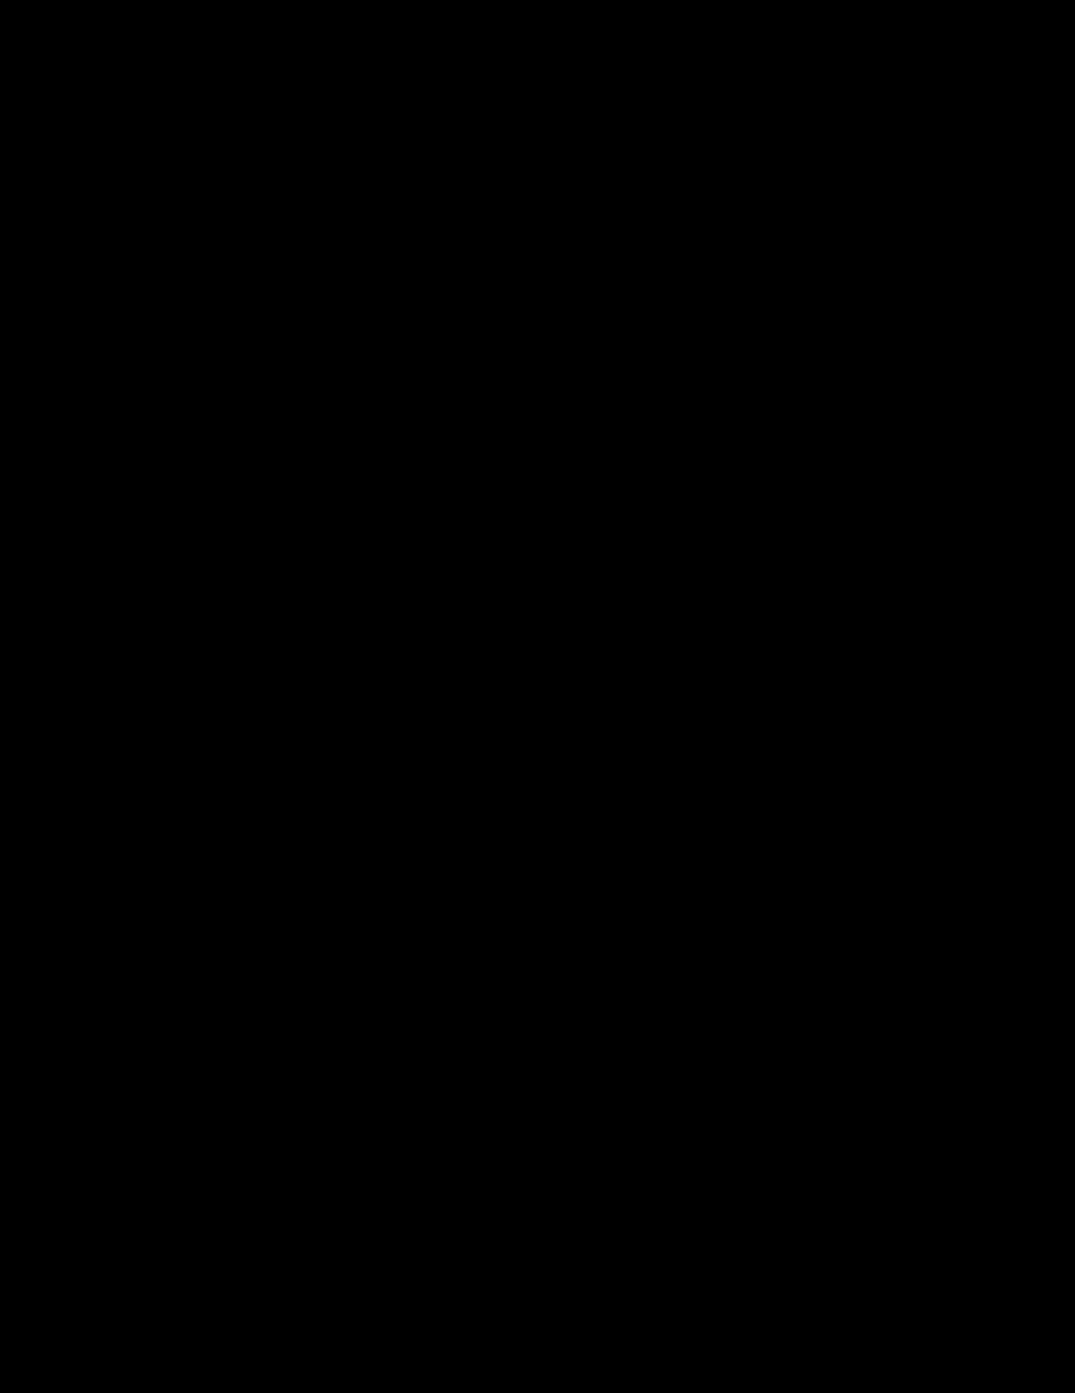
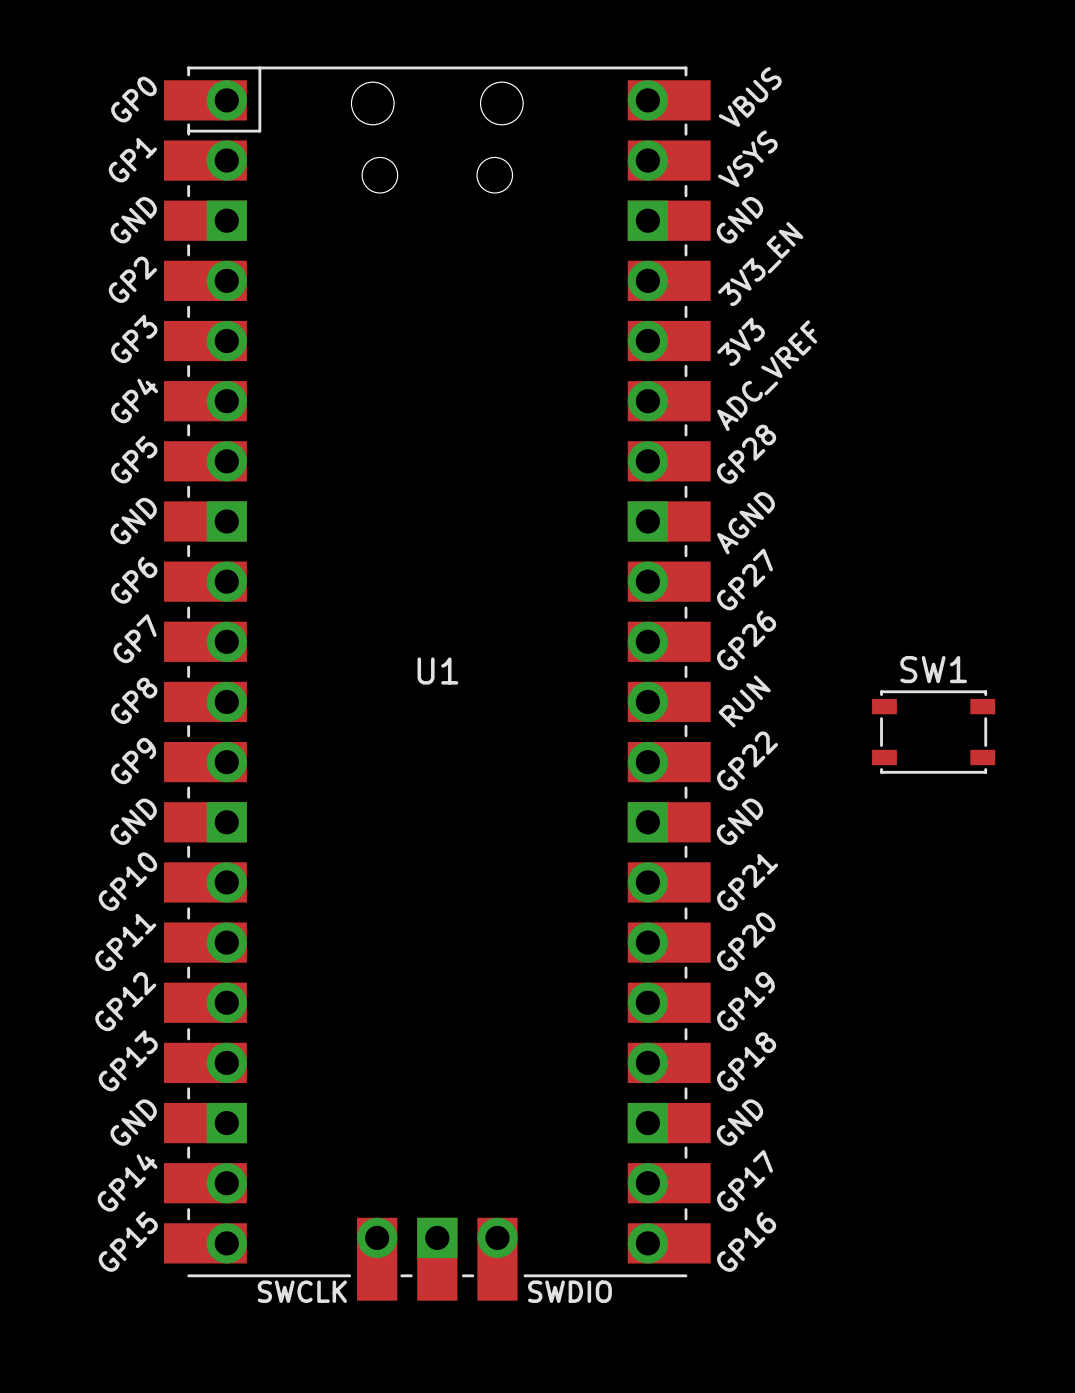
U1: none -> (437, 683)
SW1: none -> (933, 732)

